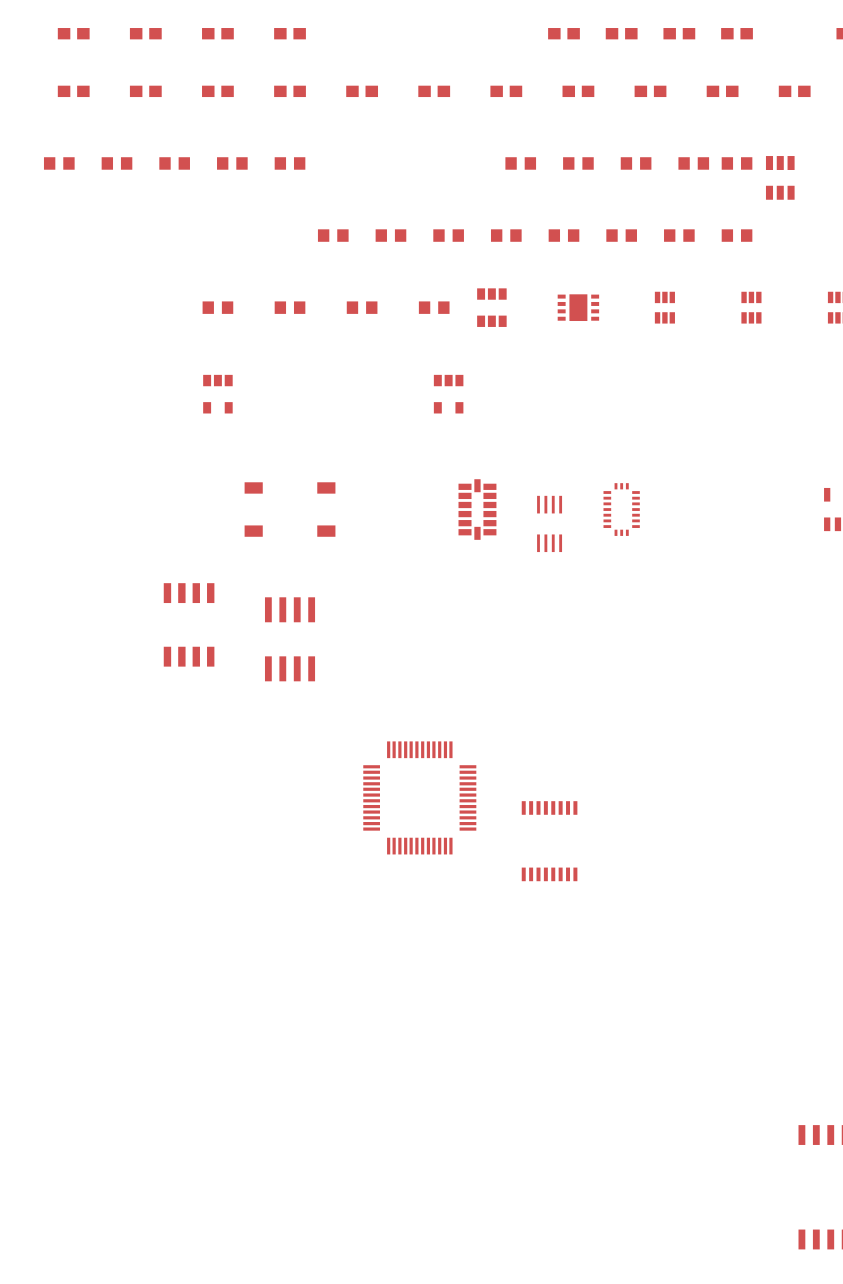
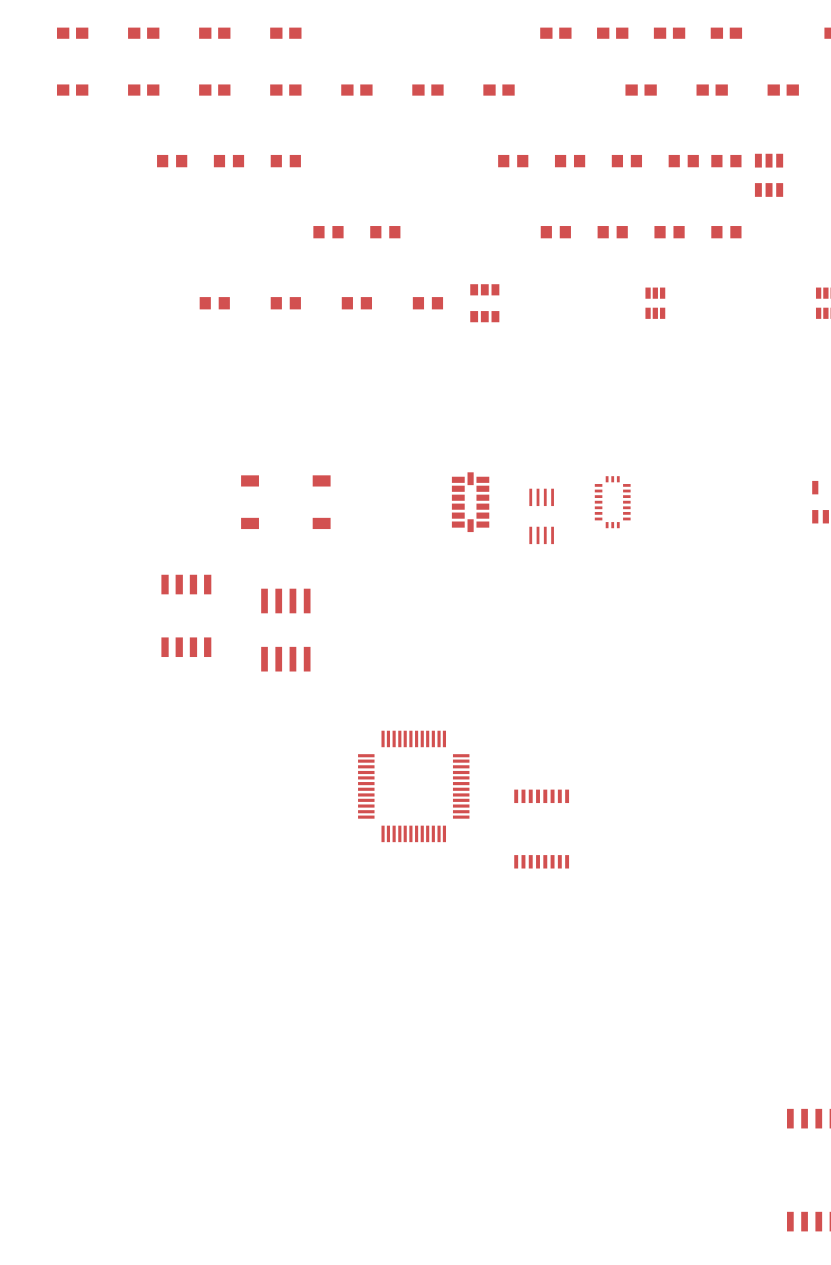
part: (578, 91) -> none
part: (59, 163) -> none
part: (116, 163) -> none
part: (448, 235) -> none
part: (506, 235) -> none
part: (578, 307) -> none
part: (751, 307) -> none
part: (217, 394) -> none
part: (448, 394) -> none

